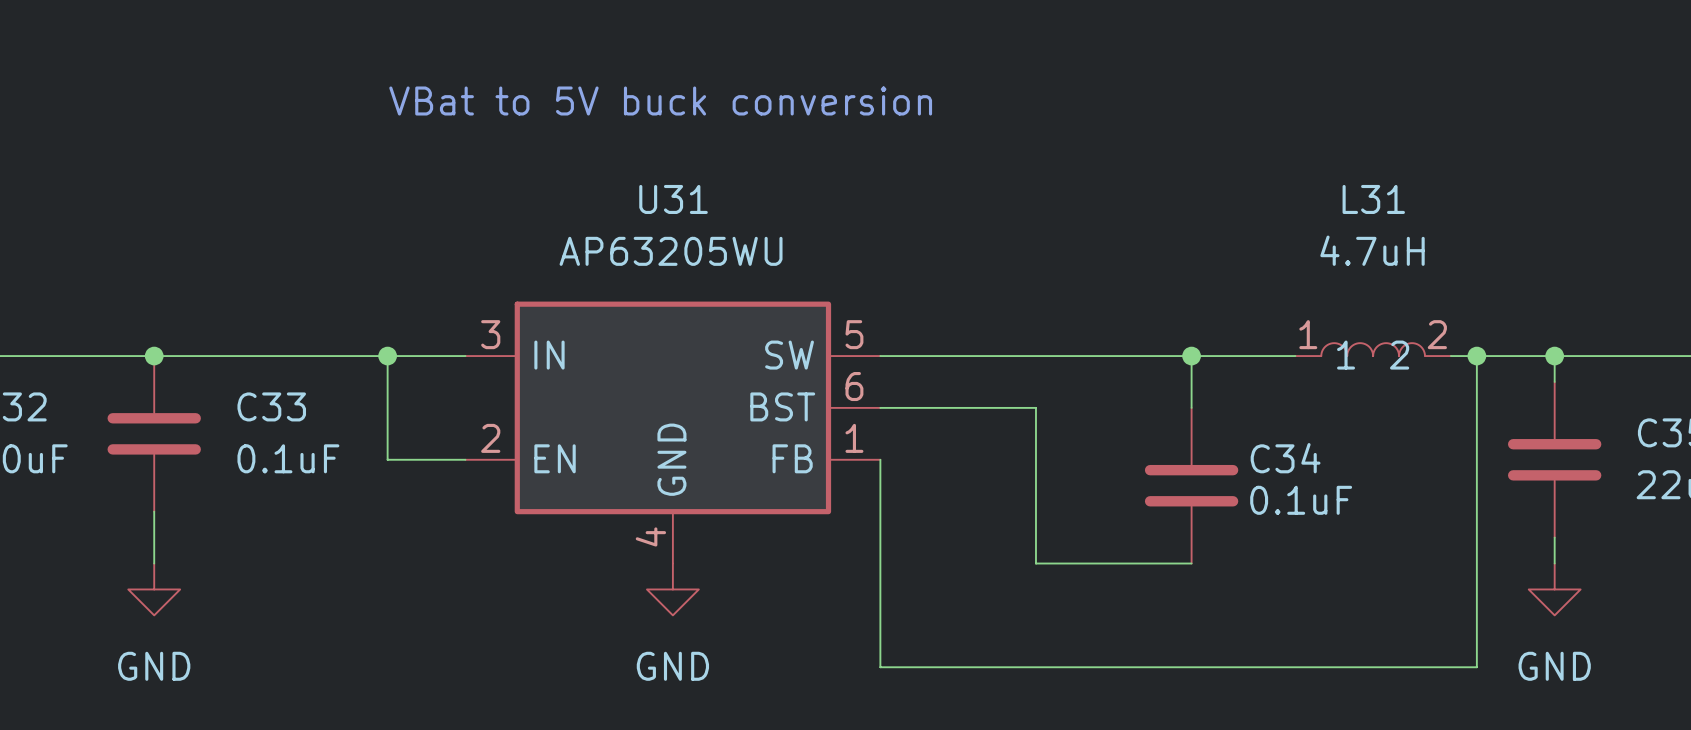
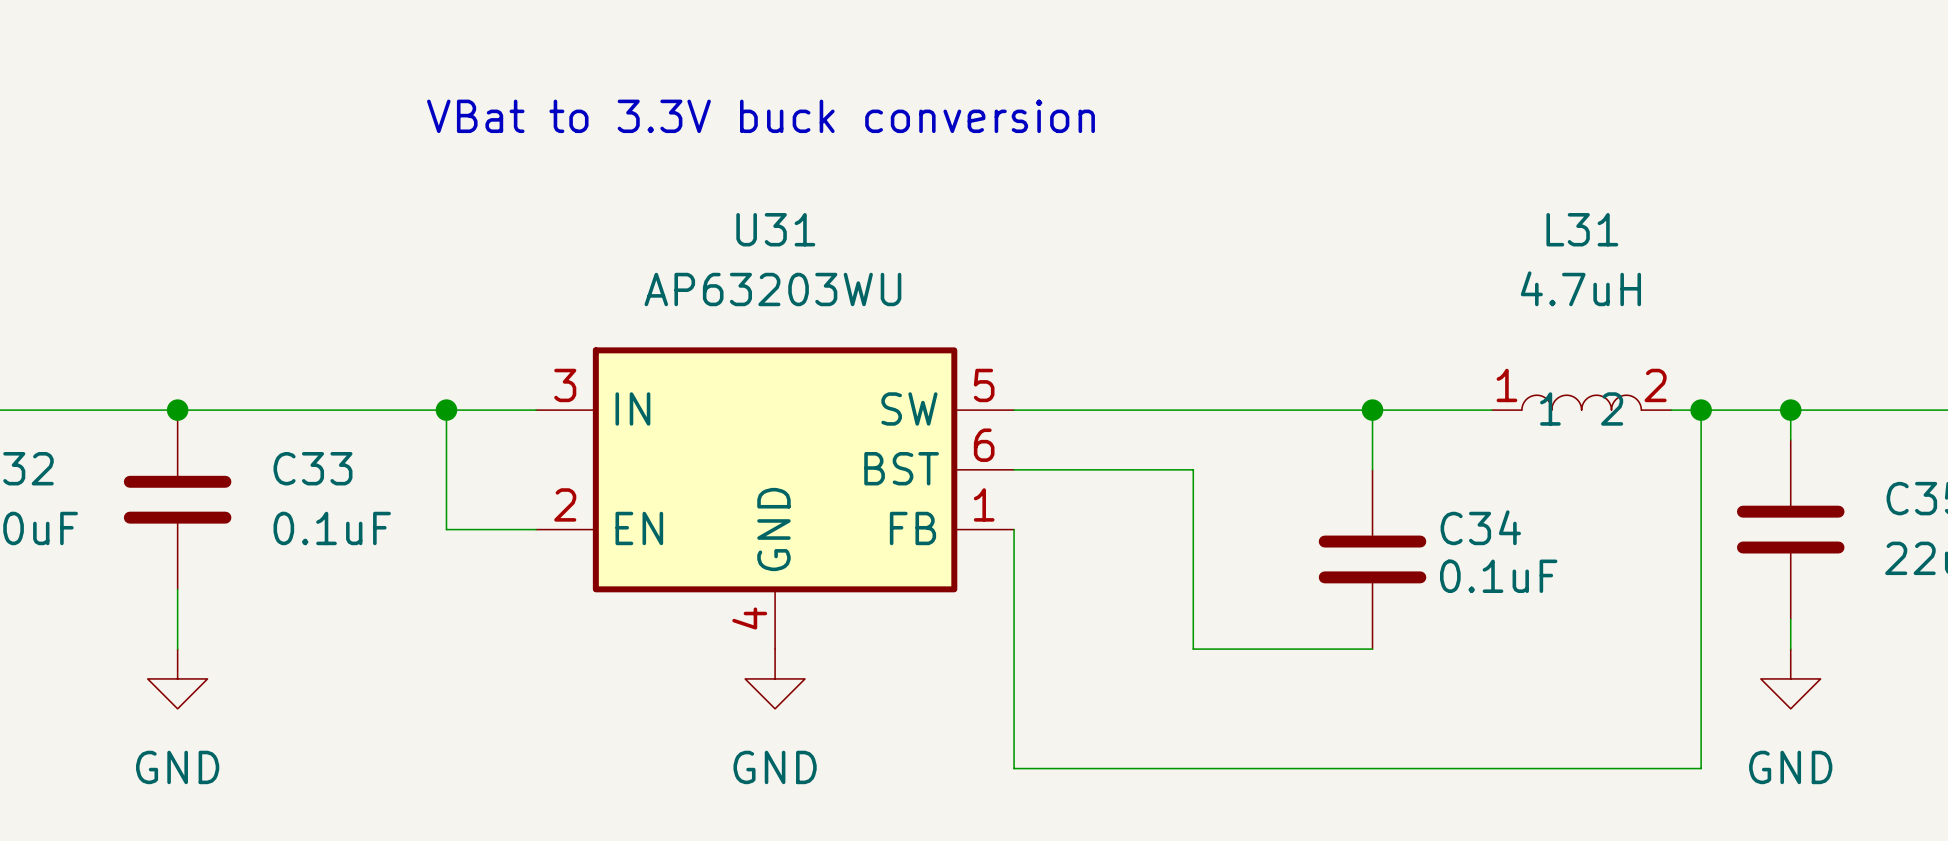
text: VBat to 5V buck conversion (660, 101) -> VBat to 3.3V buck conversion (760, 116)
U31 value: AP63205WU (671, 251) -> AP63203WU (772, 289)

